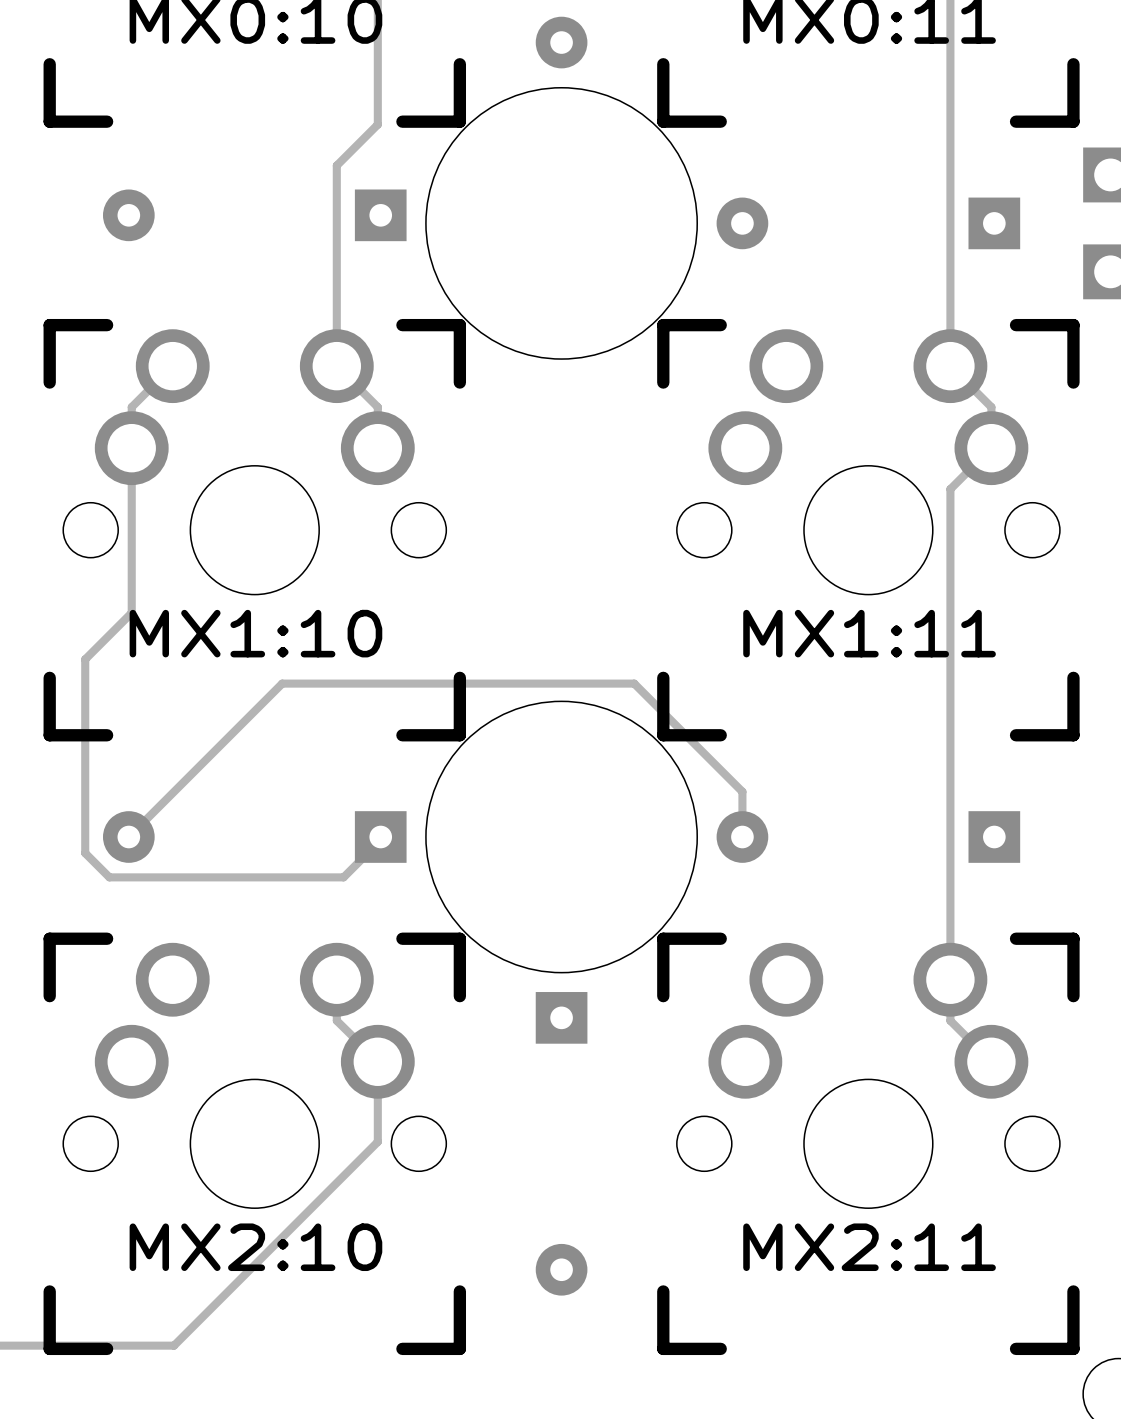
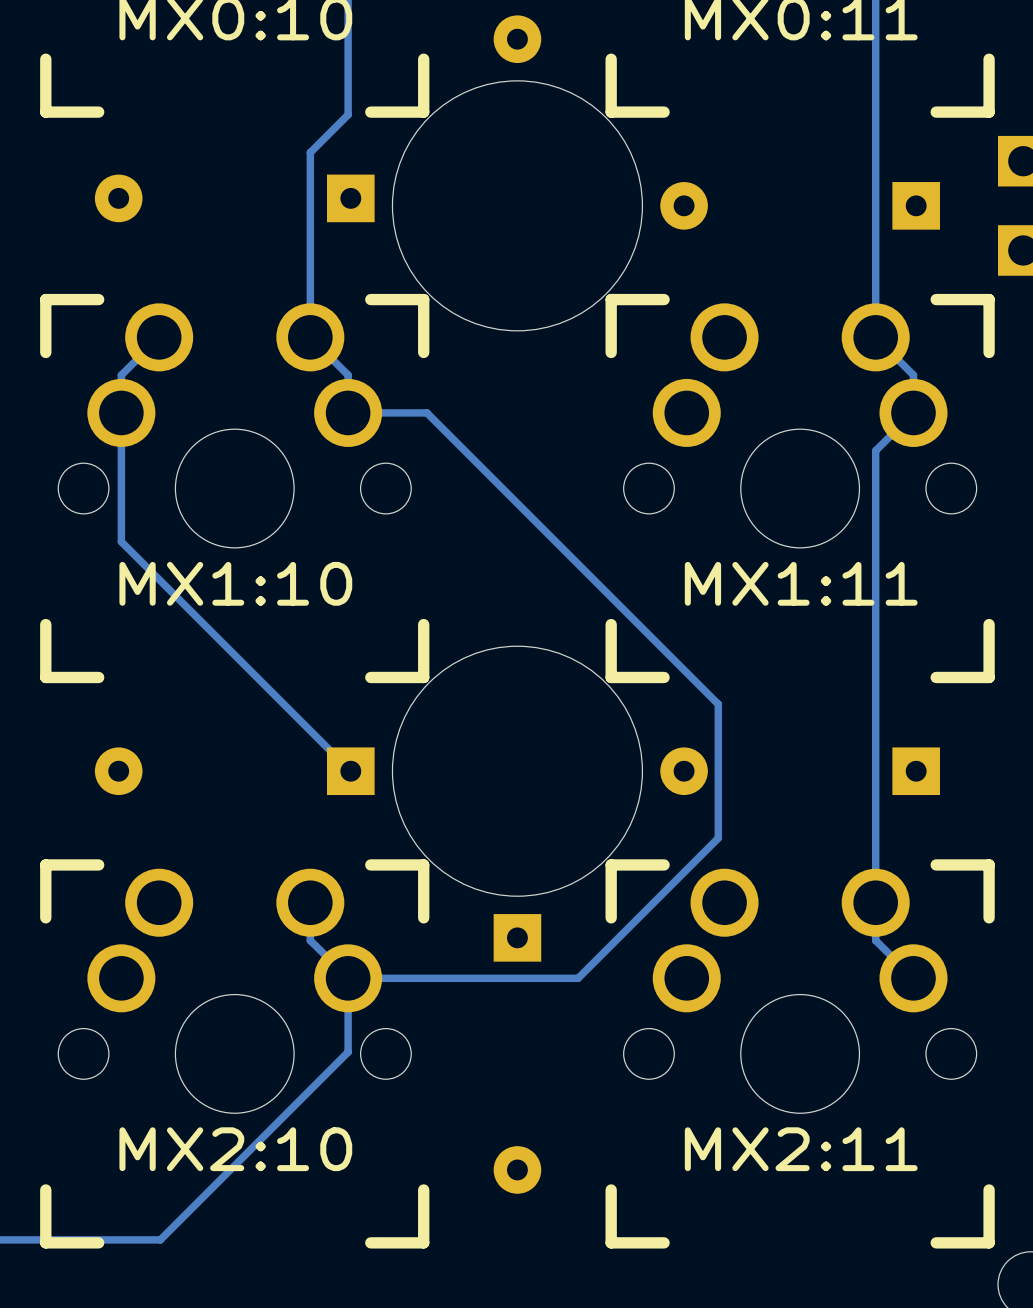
track: none -> (348, 412) (426, 412) (718, 704) (718, 838) (578, 978) (348, 978)
track: (131, 588) (131, 612) (85, 659) (85, 853) (109, 877) (343, 877) (380, 840) (380, 837) -> (121, 541) (350, 771)
track: (742, 837) (742, 791) (634, 683) (282, 683) (128, 837) -> none

